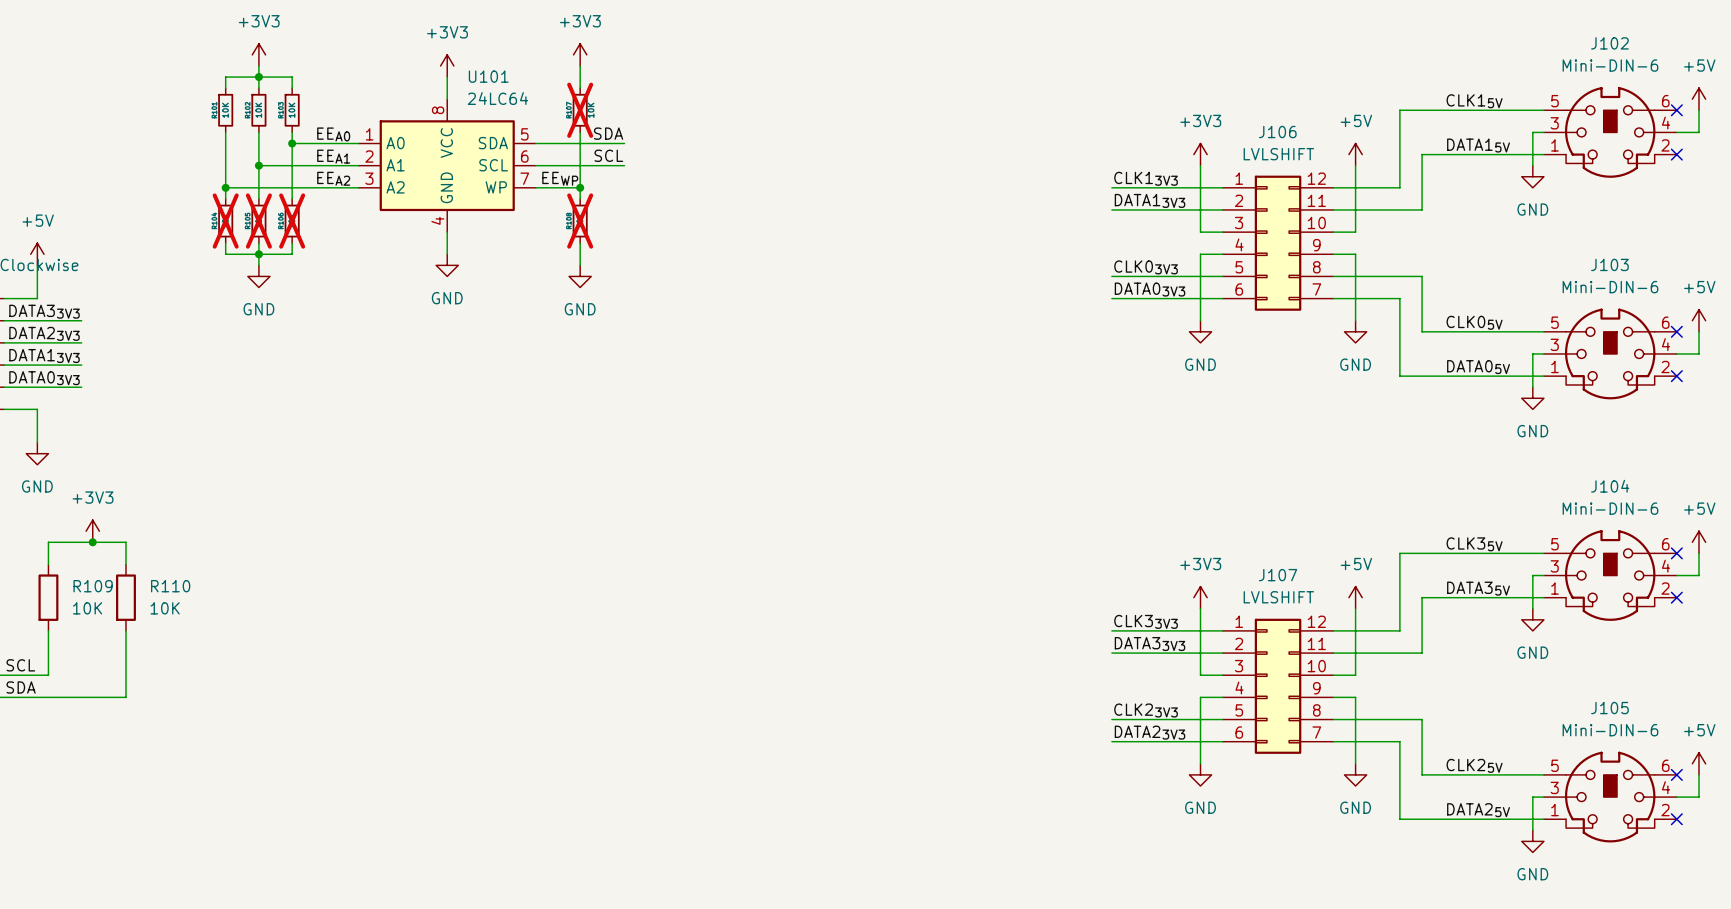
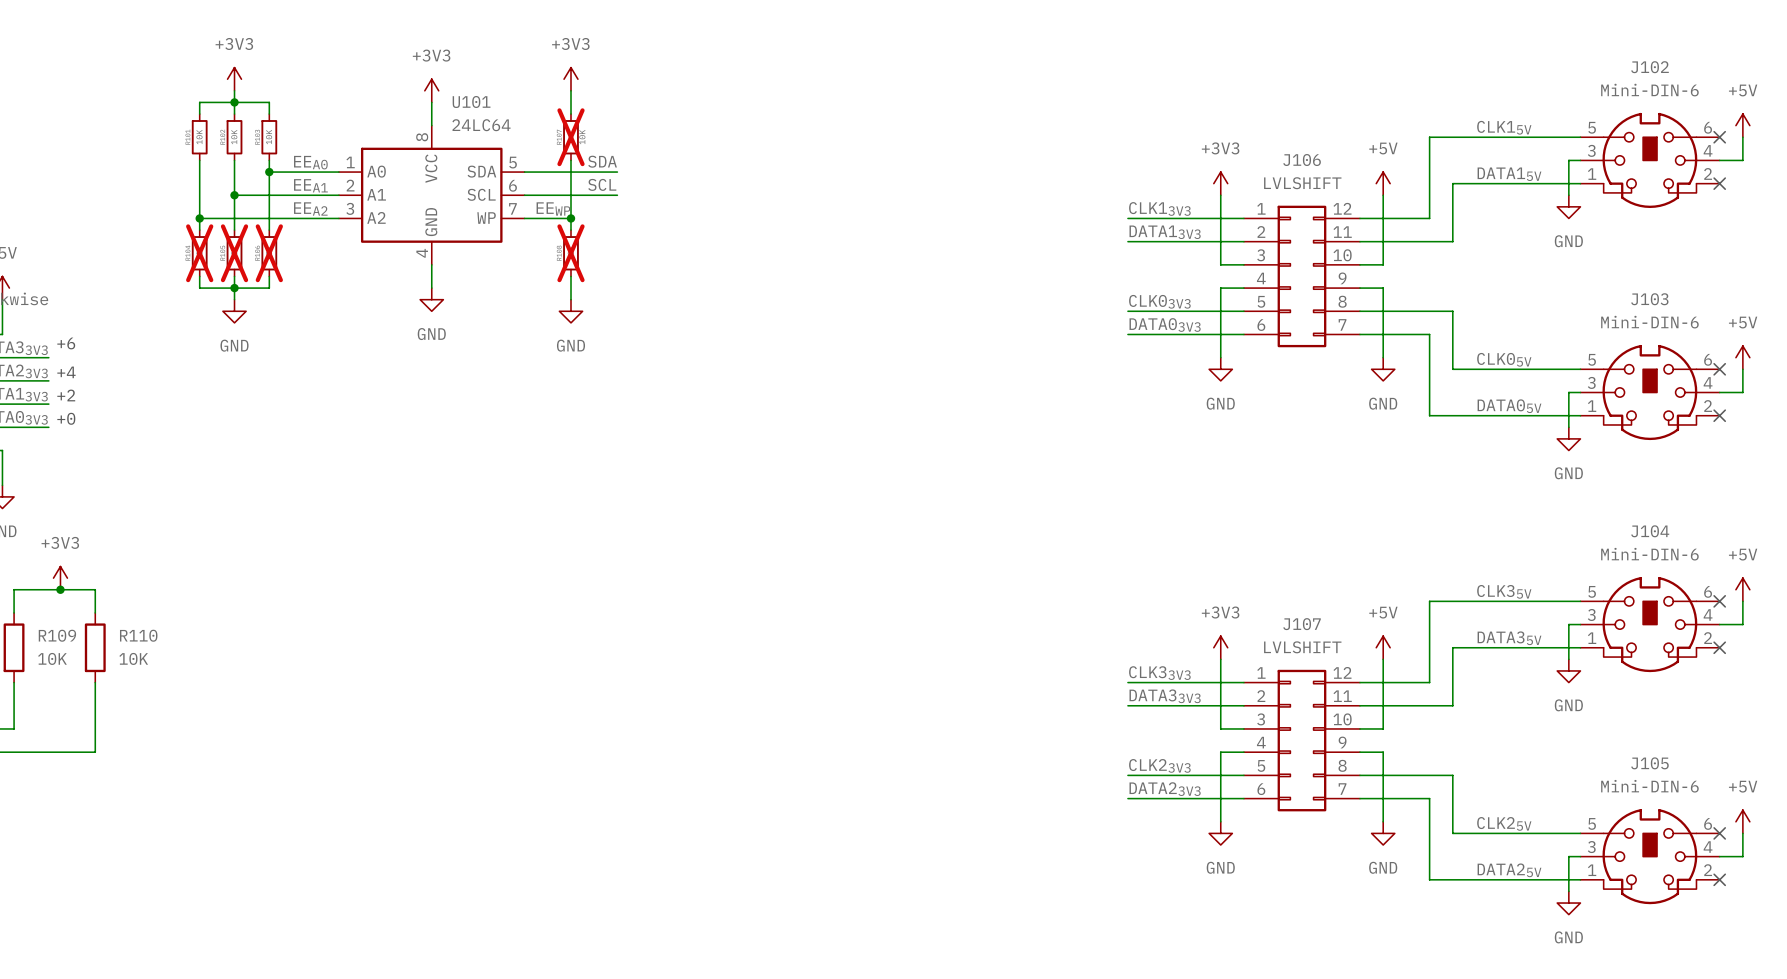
text: none -> +6 (66, 343)
text: none -> +4 (66, 372)
text: none -> +2 (66, 395)
text: none -> +0 (66, 418)

